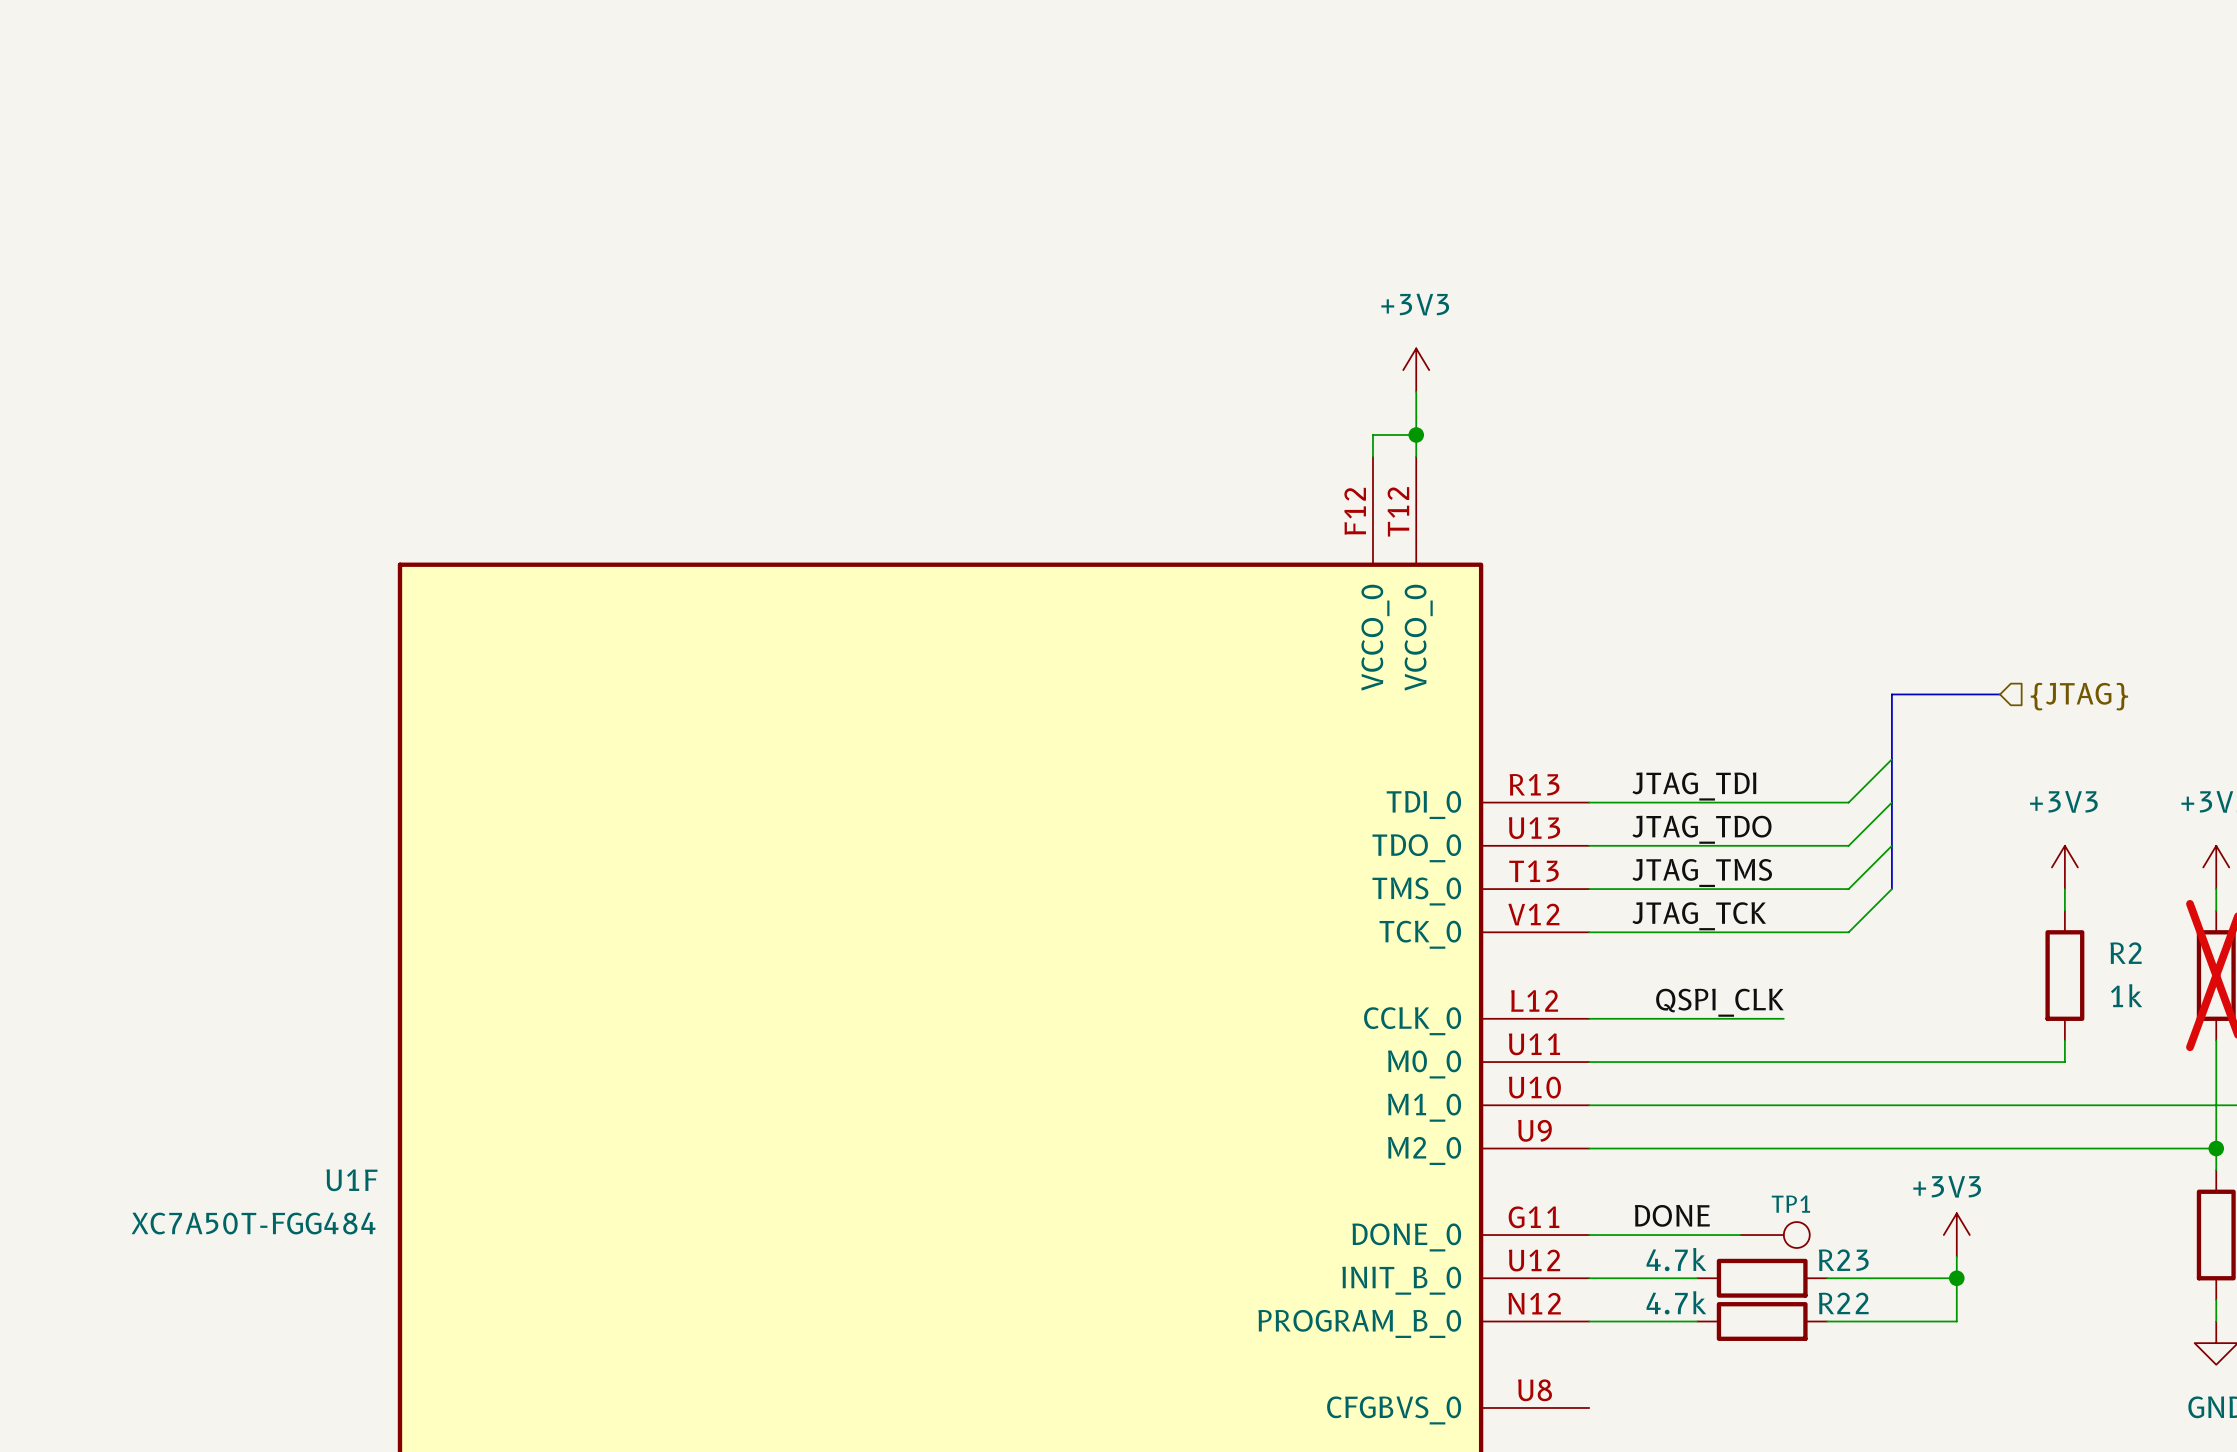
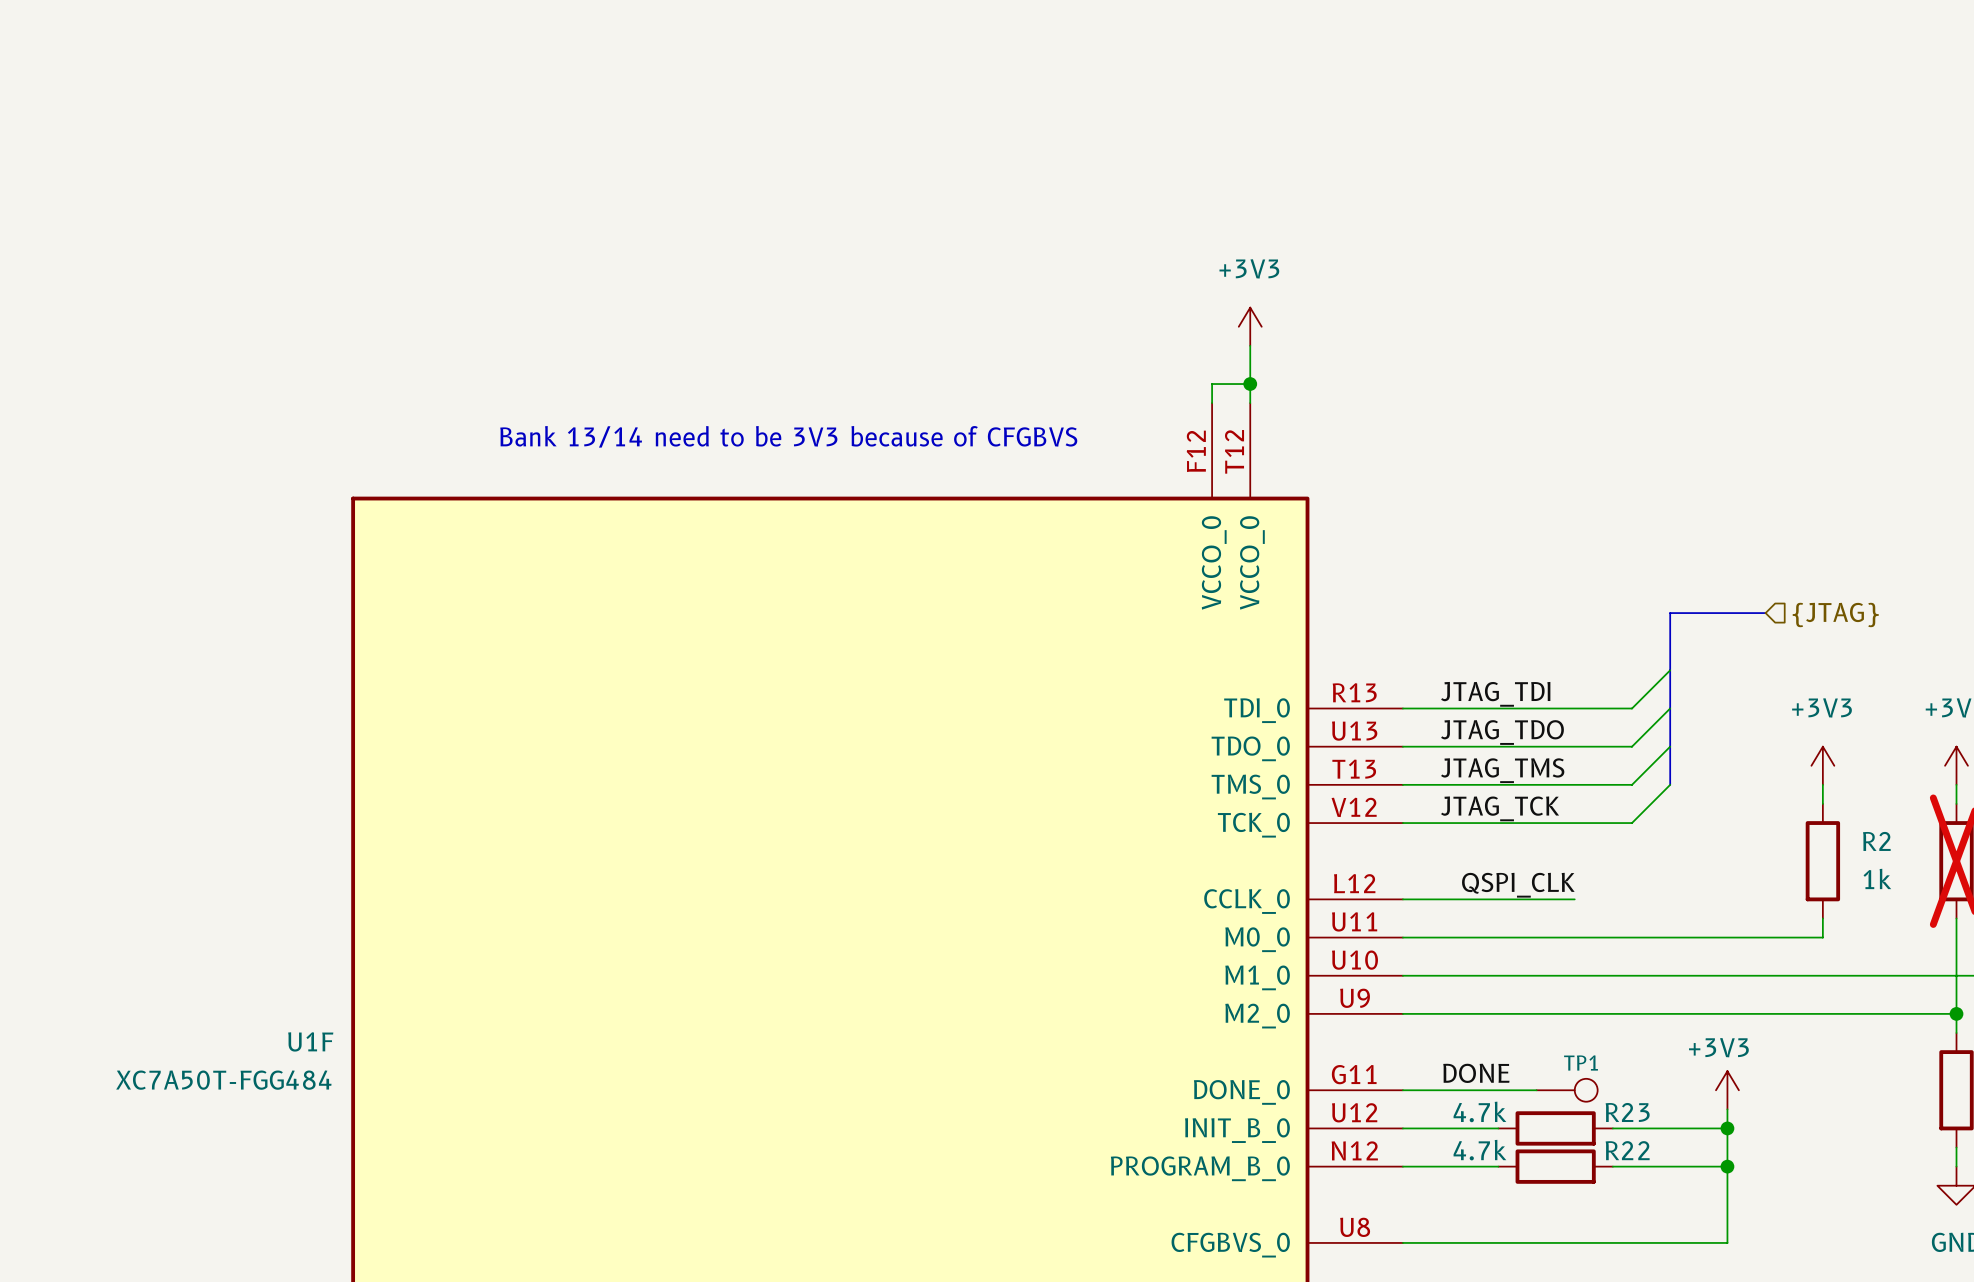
text: none -> Bank 13/14 need to be 3V3 because of CFGBVS (788, 436)
wire: none -> (1727, 1166) (1727, 1242) (1402, 1242)
junction: none -> (1727, 1166)

